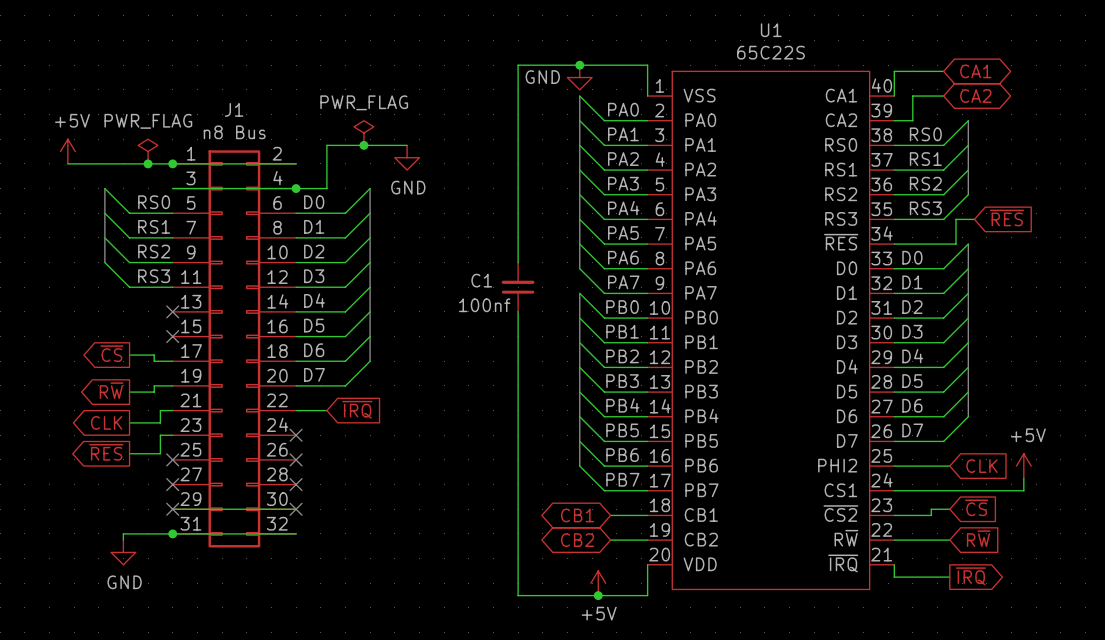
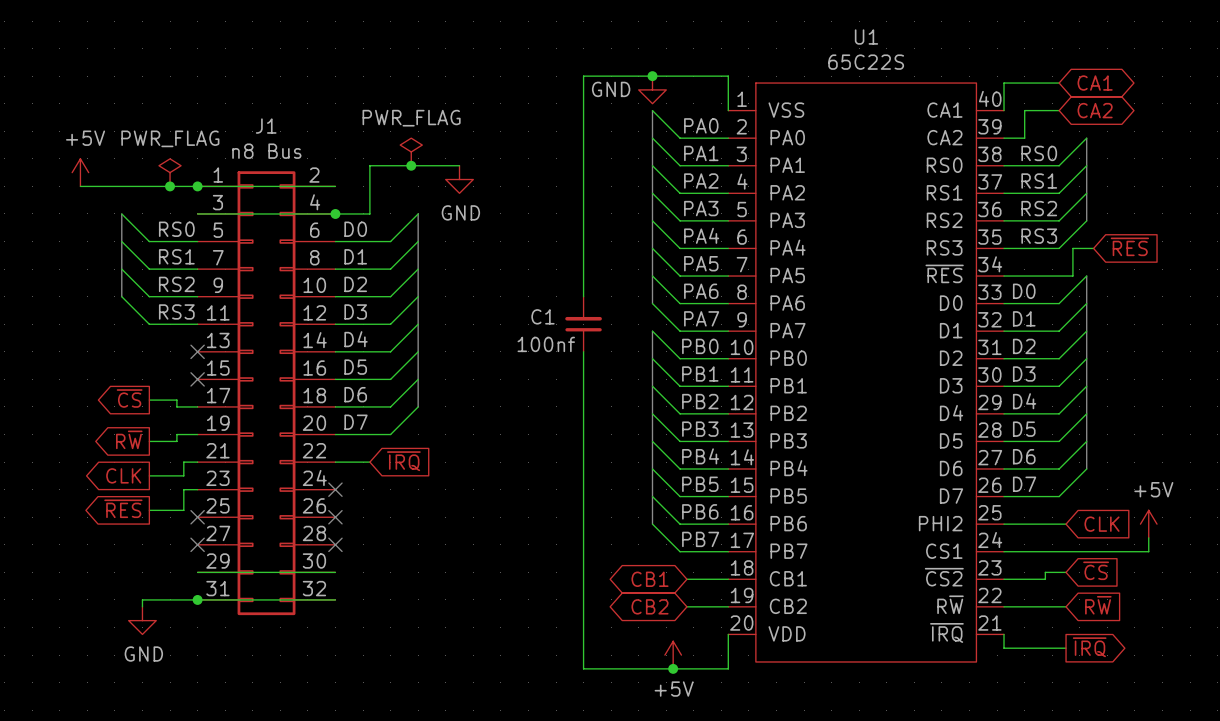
no-connect mark: (172, 509) -> none
no-connect mark: (296, 509) -> none

